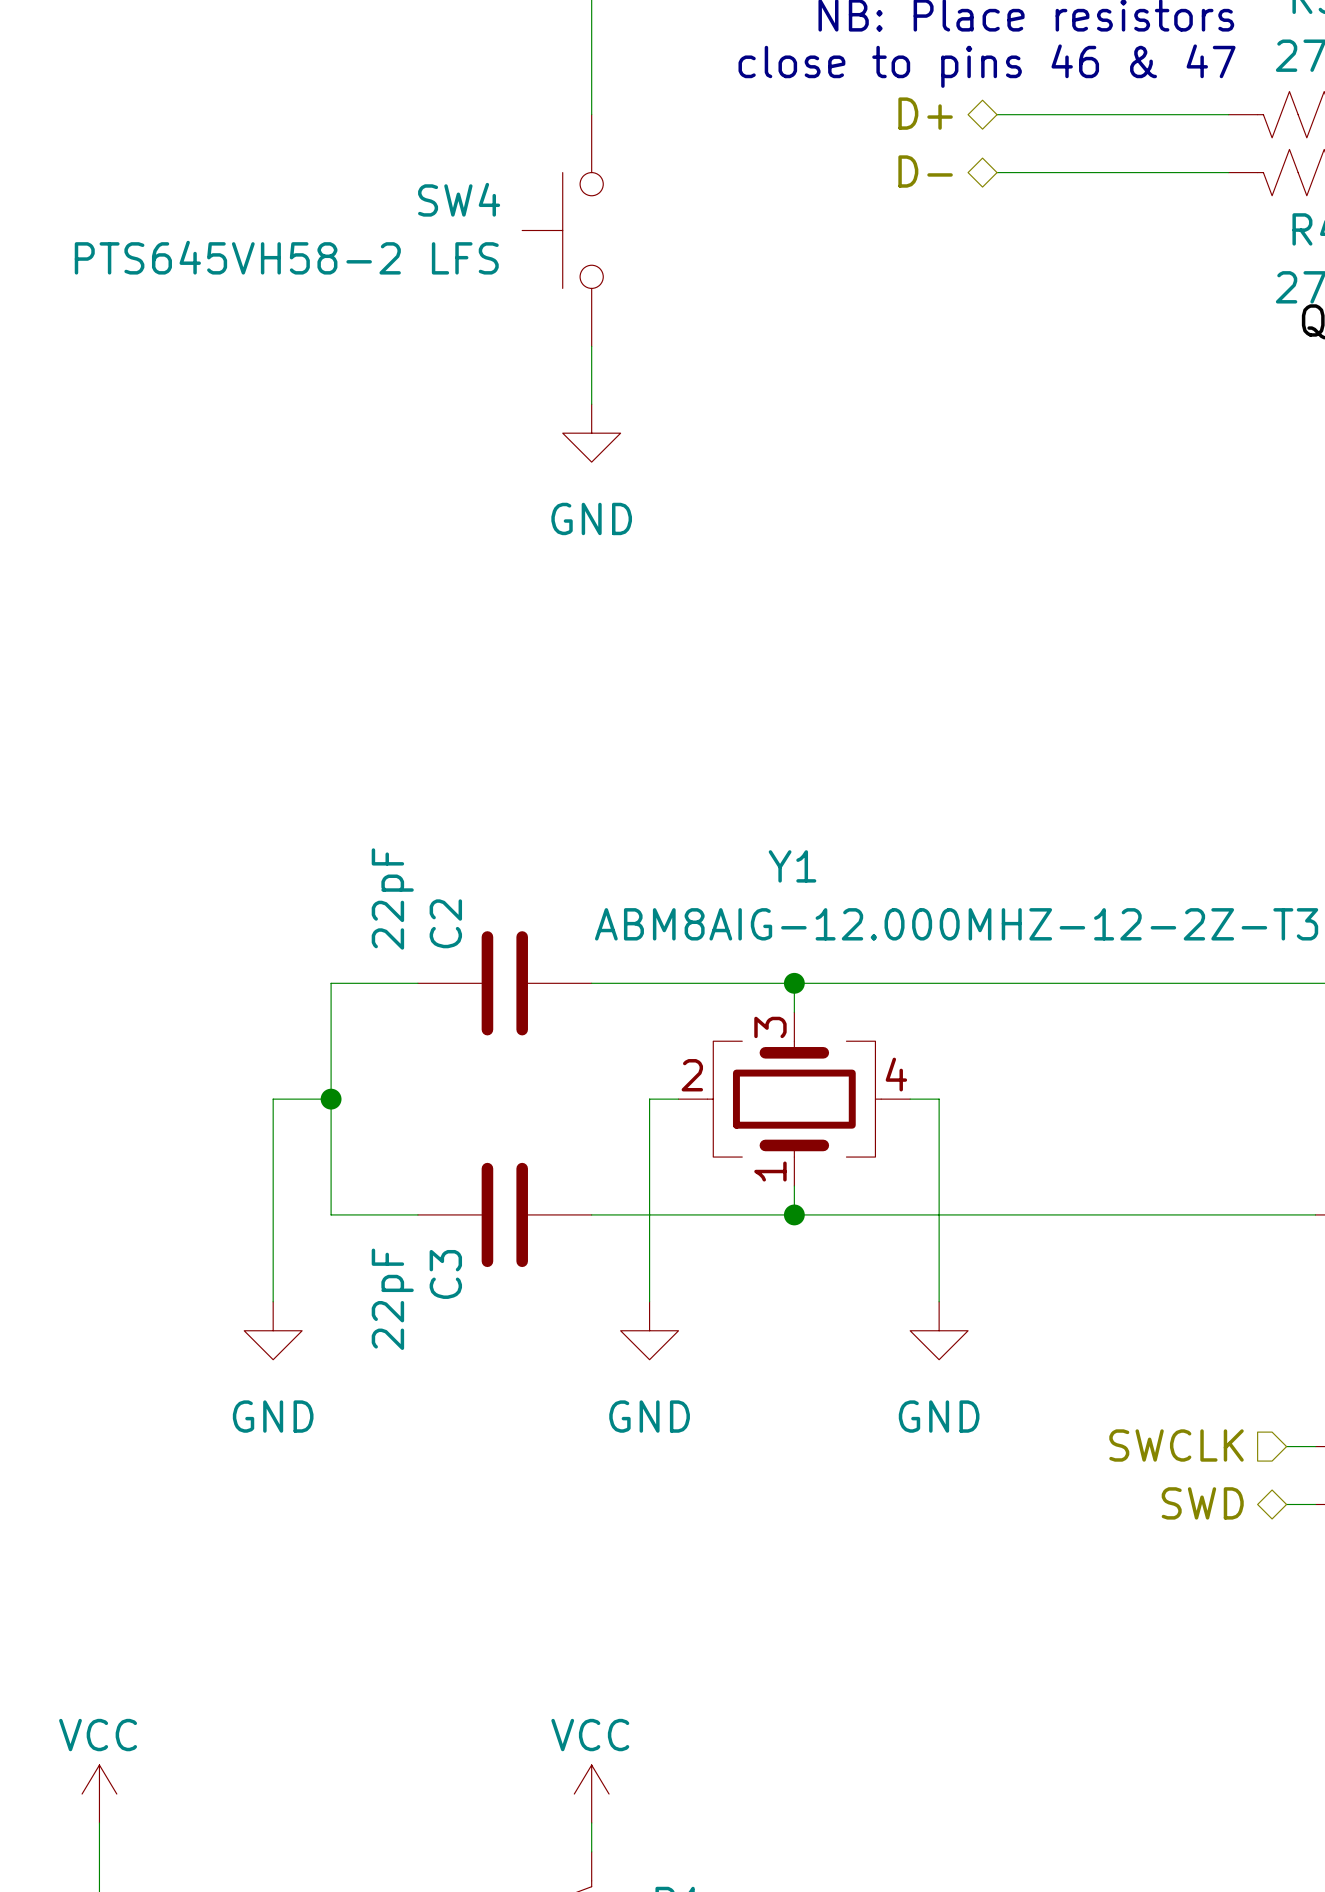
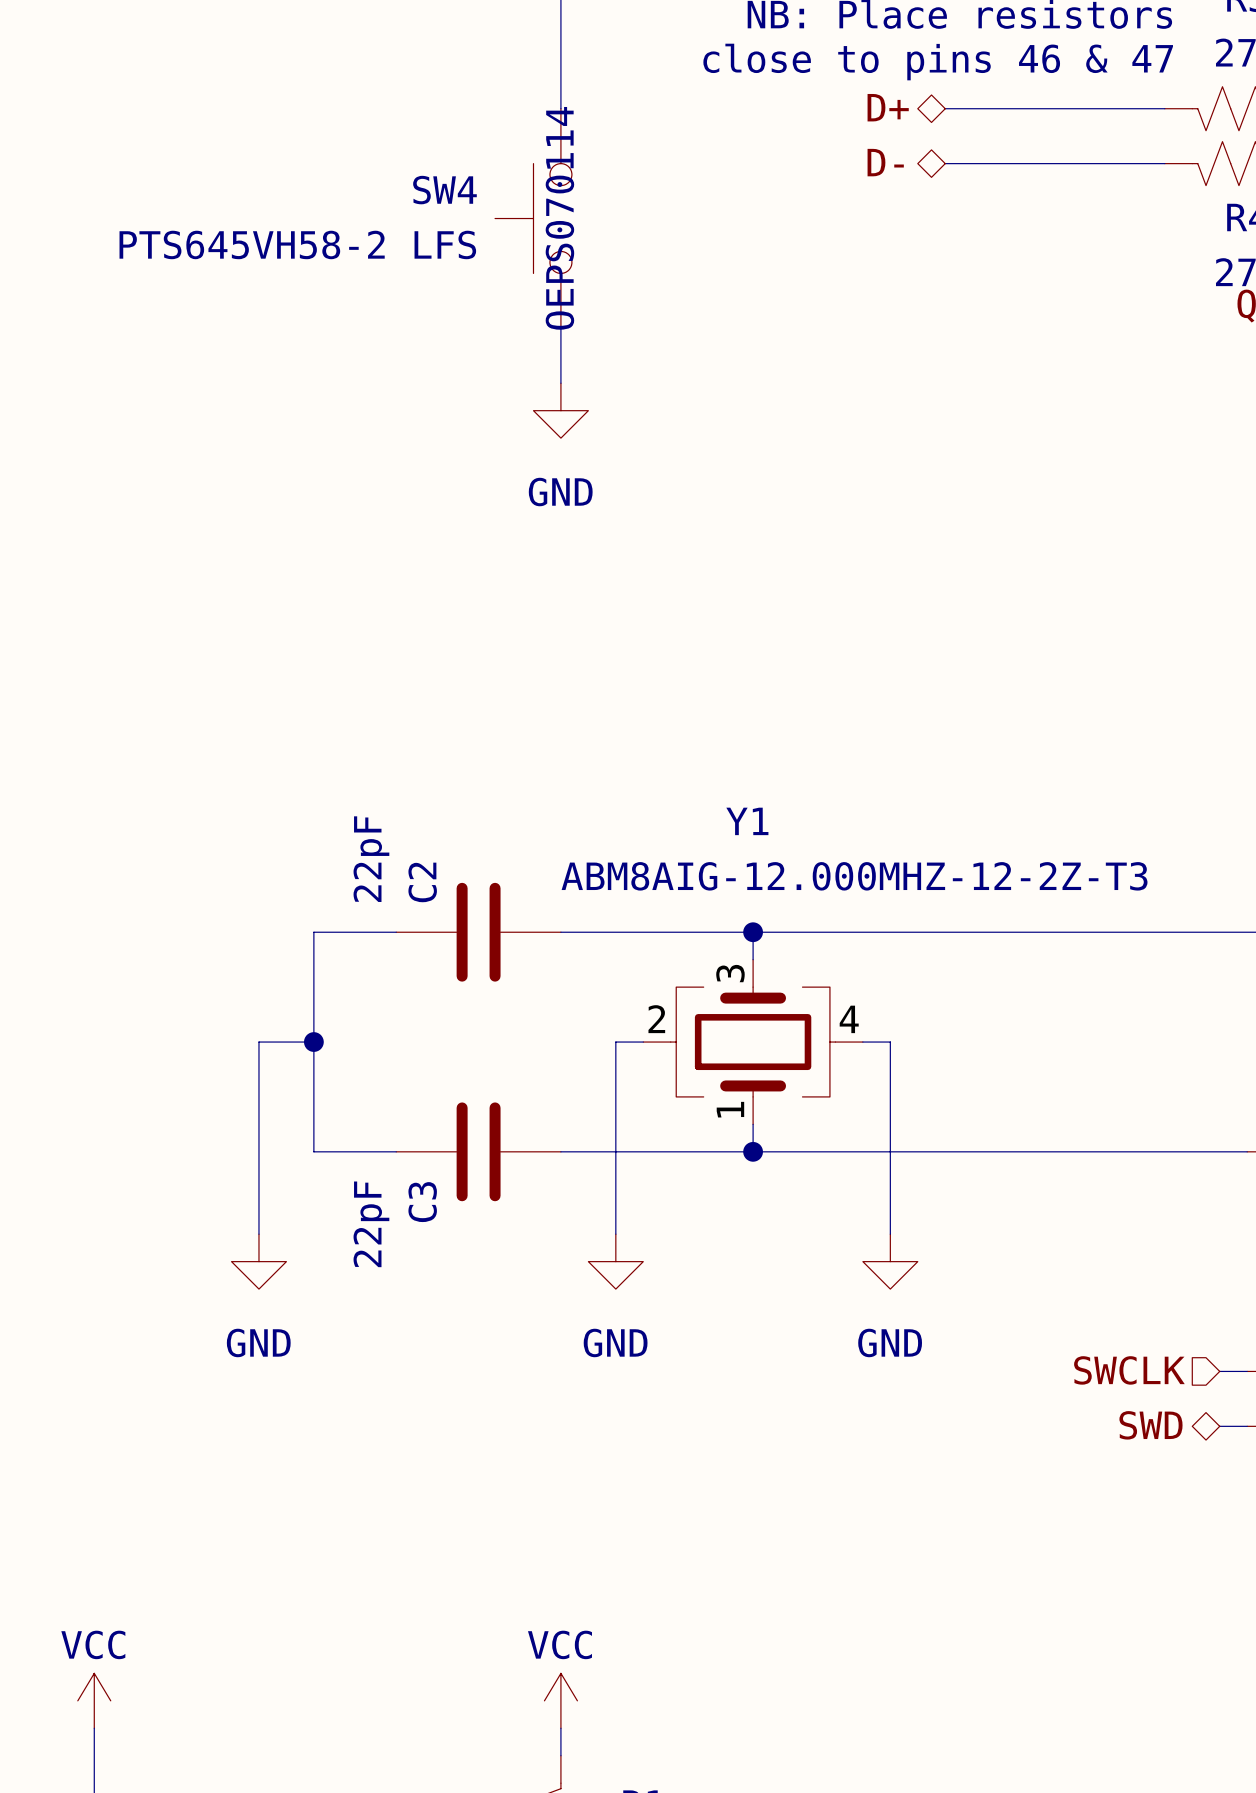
SW4 text: none -> OEPS070114 (559, 218)

